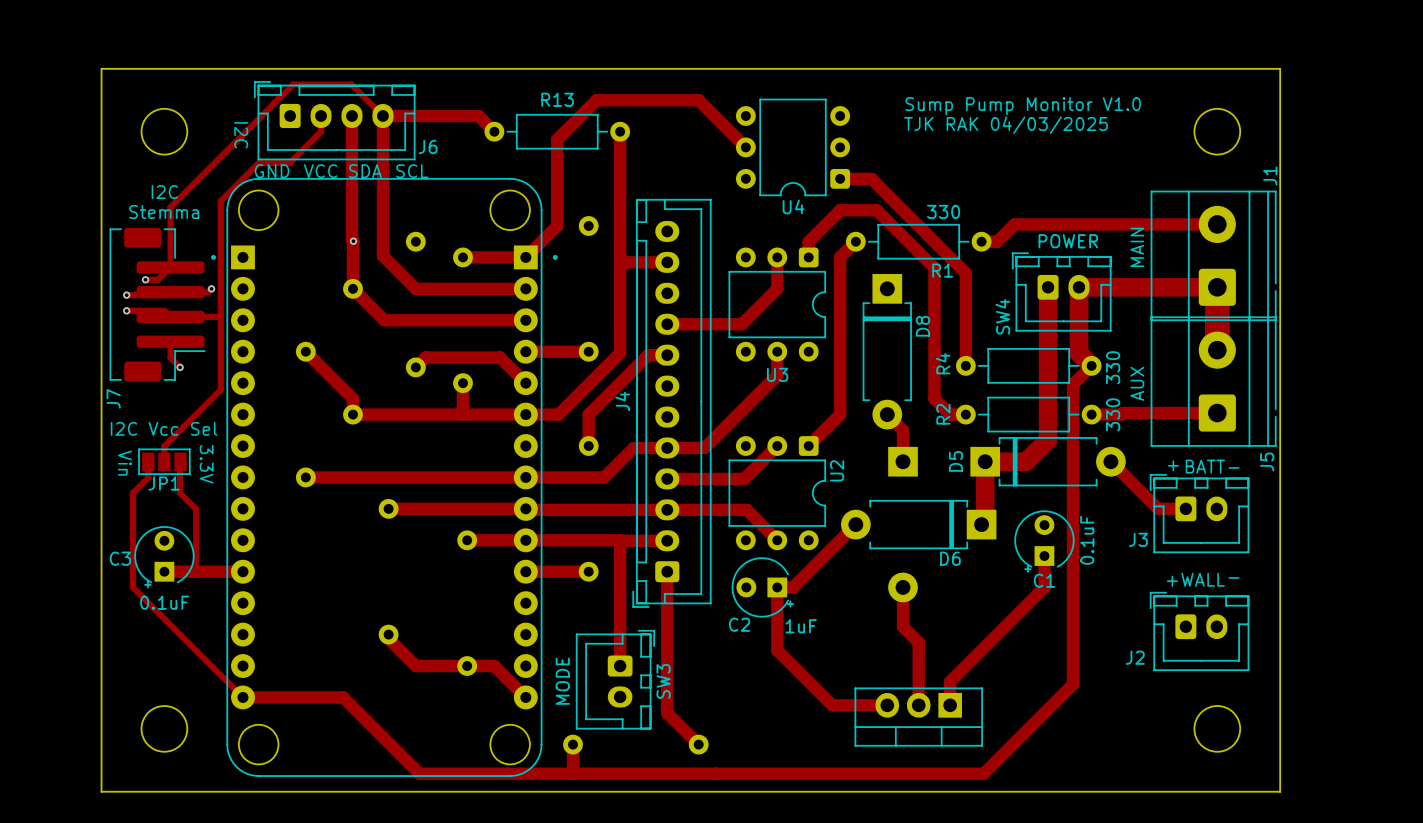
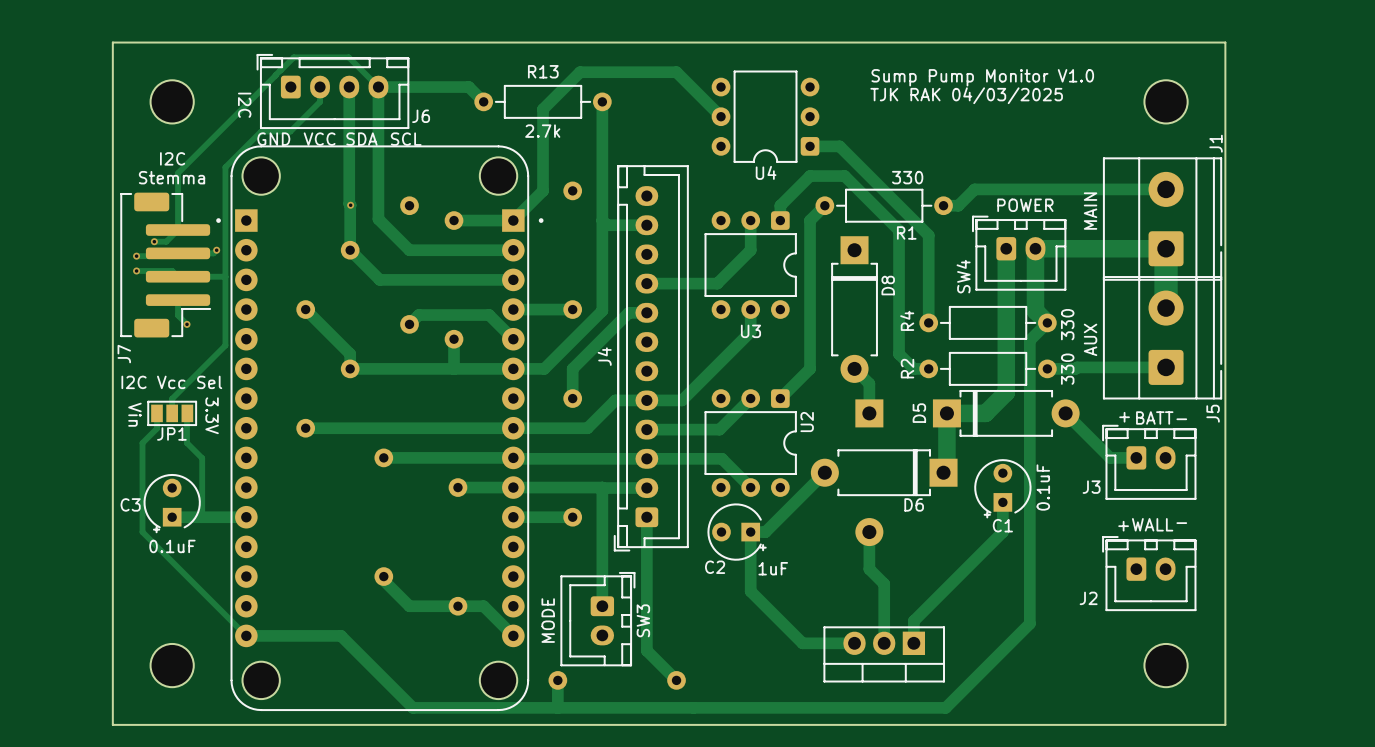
R13 value: none -> 2.7k (542, 131)

